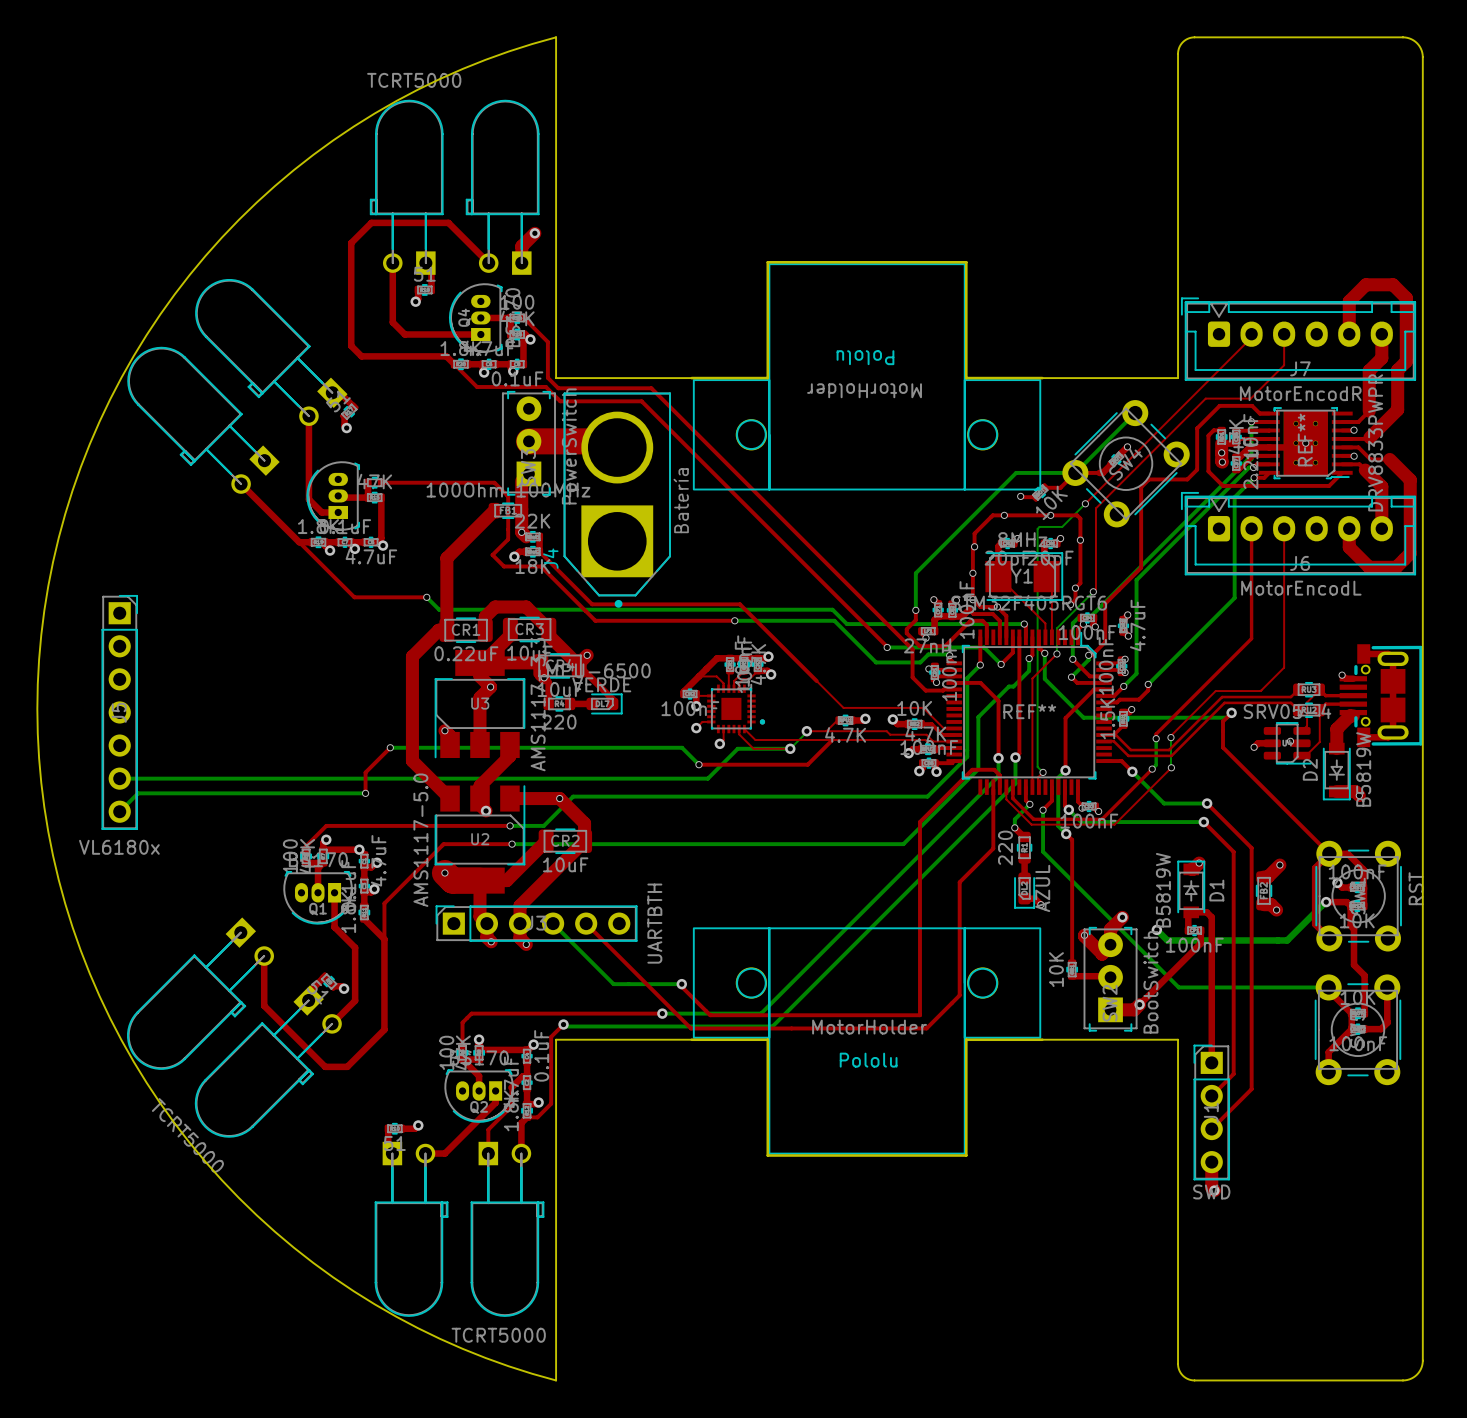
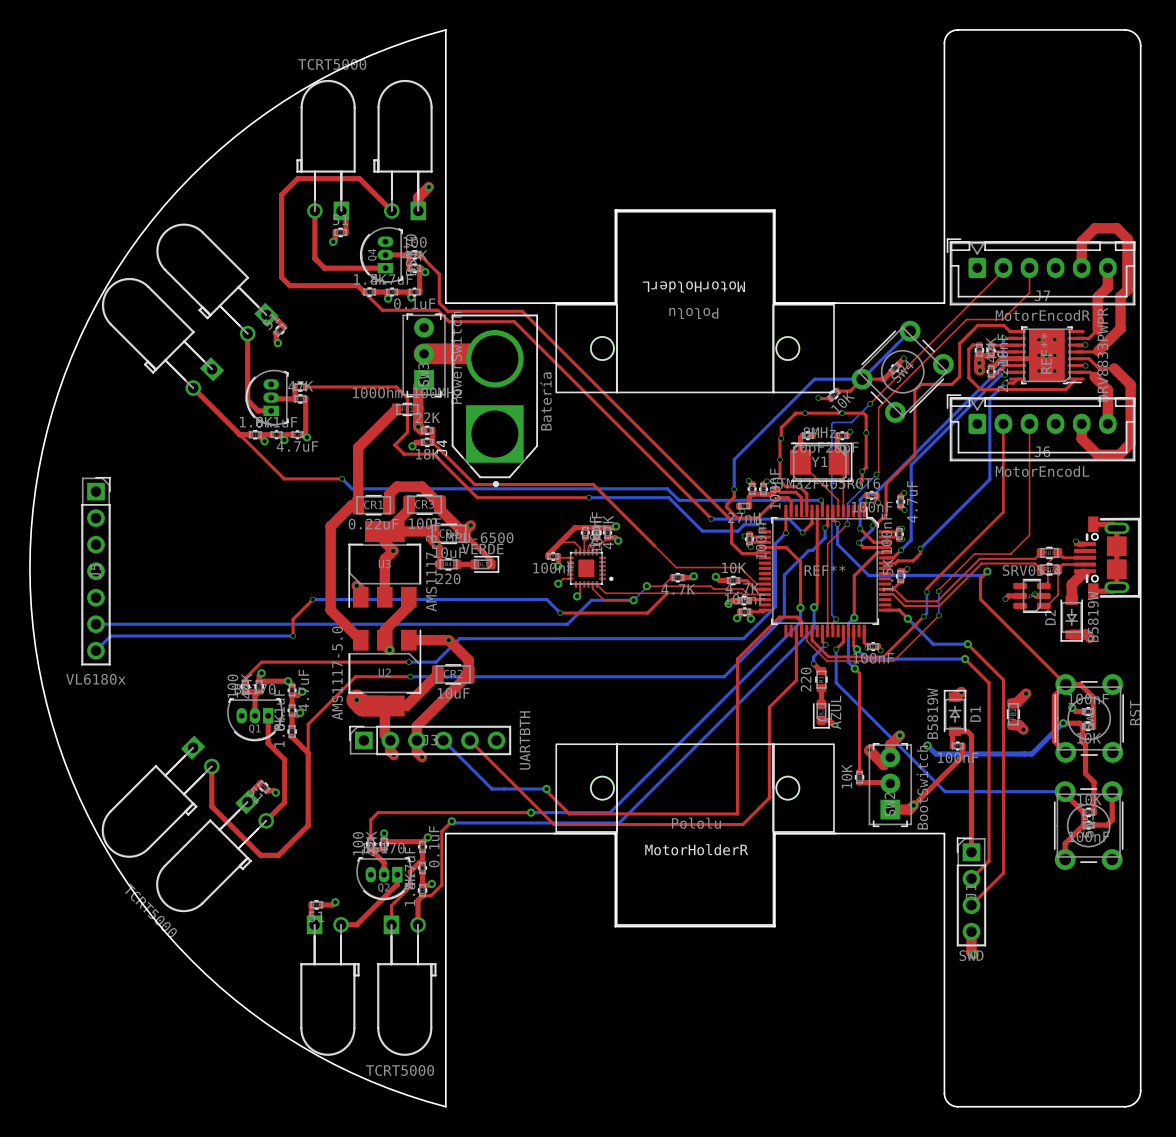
Pololu name: Pololu (865, 357) -> MotorHolderL (693, 286)
Pololu value: MotorHolder (864, 390) -> Pololu (693, 313)
Pololu value: MotorHolder (869, 1027) -> Pololu (696, 823)
Pololu name: Pololu (868, 1060) -> MotorHolderR (696, 849)

